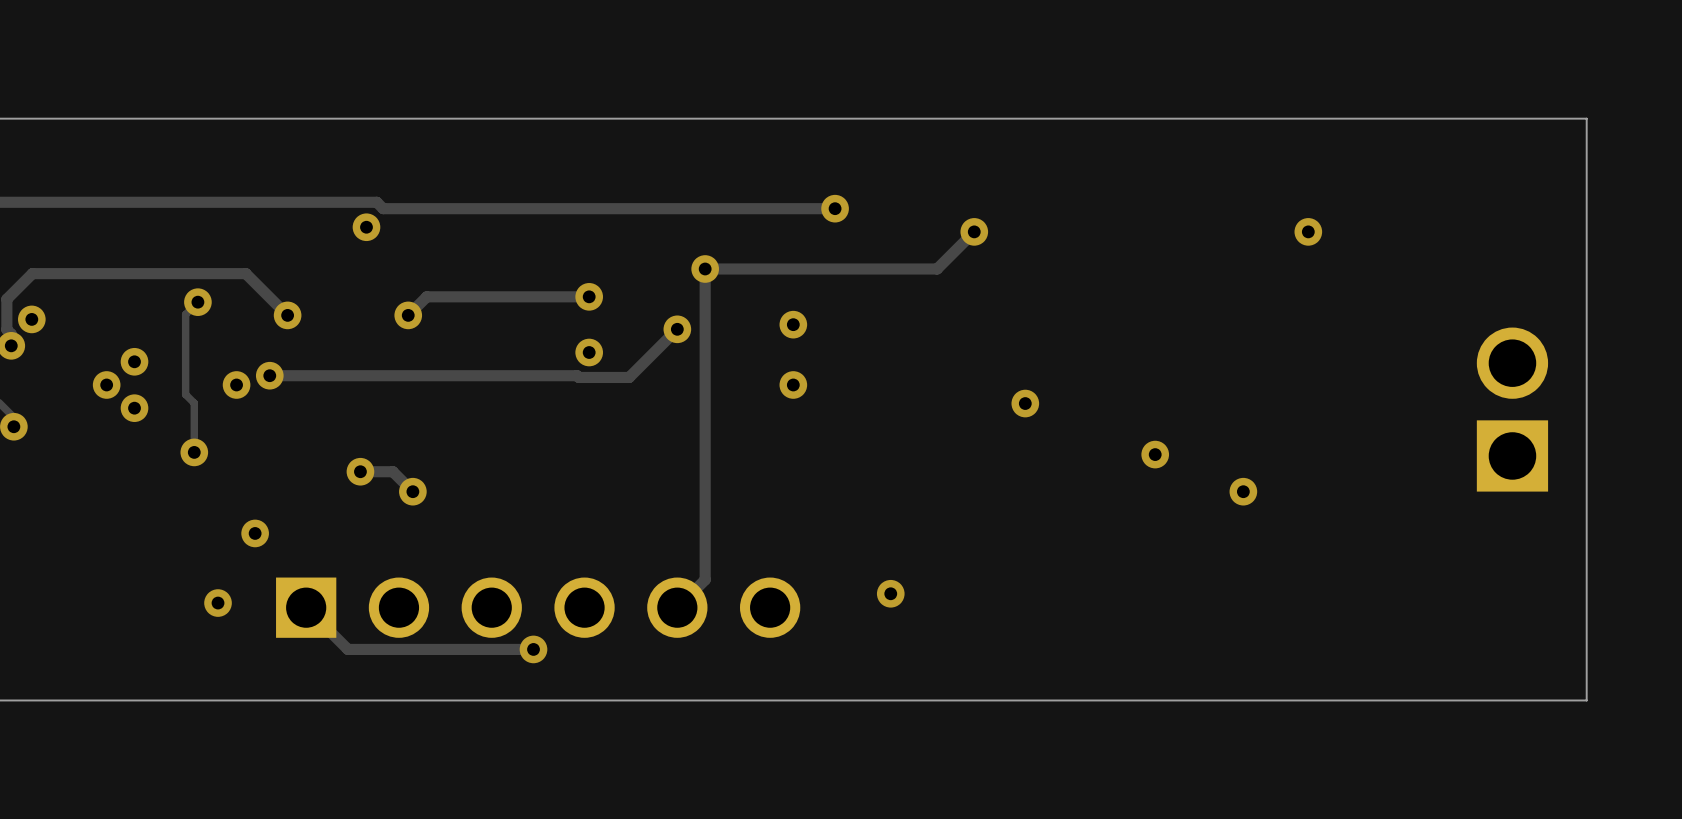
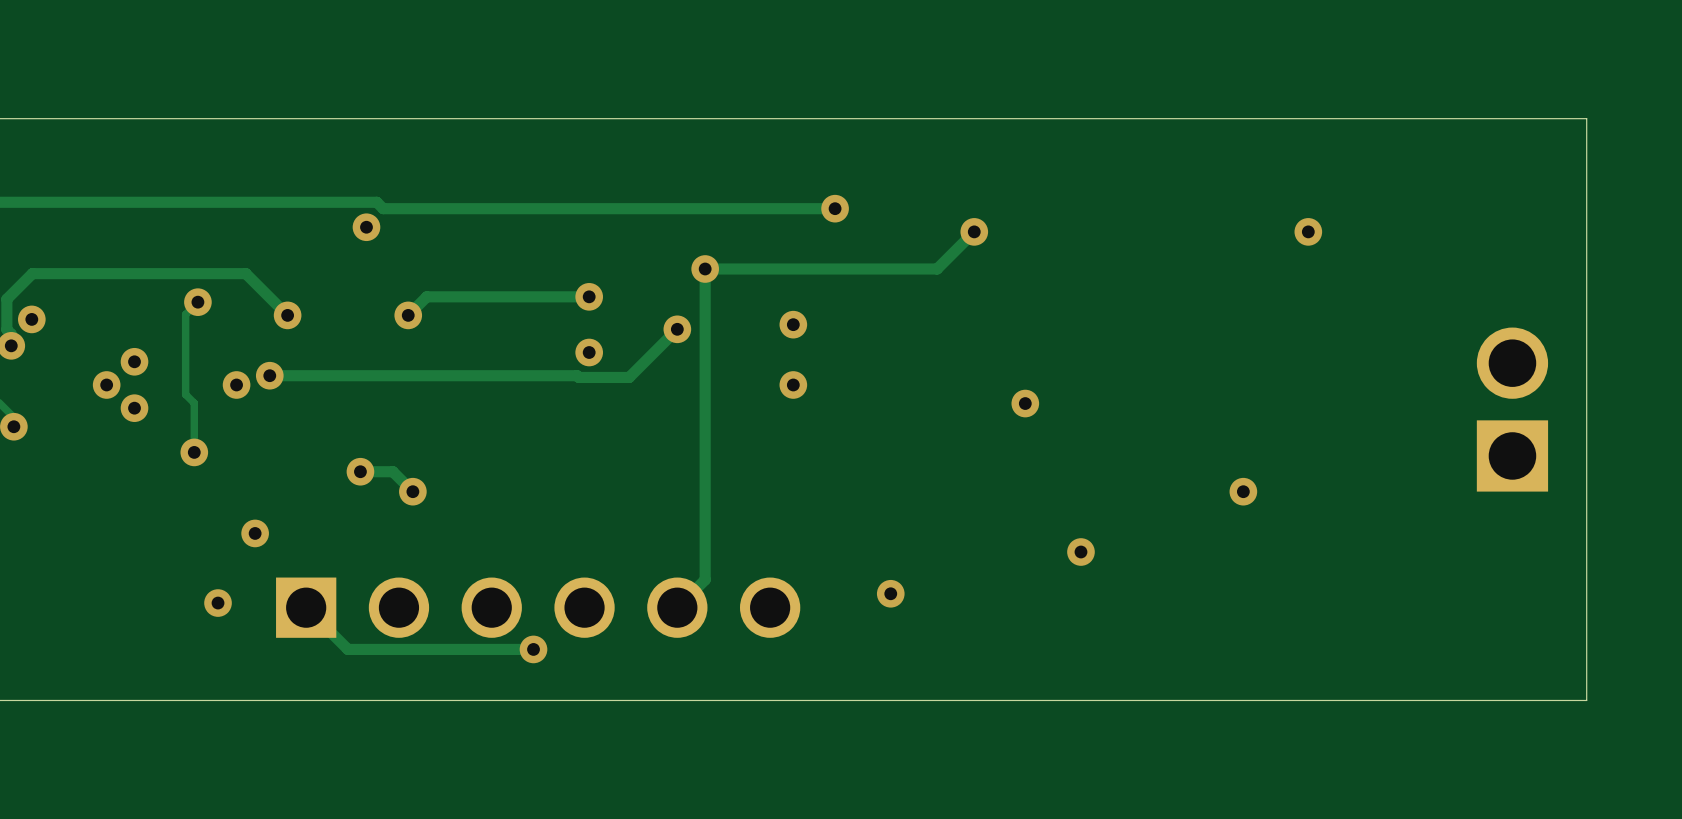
via position: (1155, 454) -> (1080, 552)

